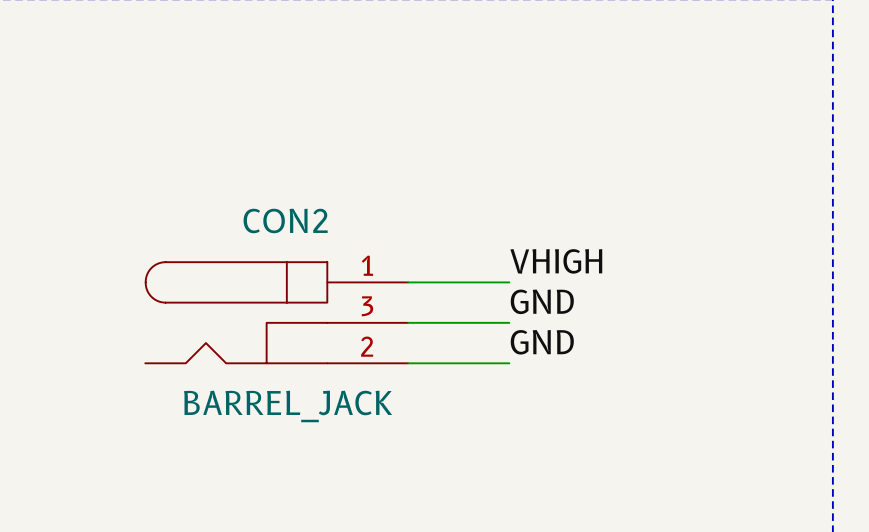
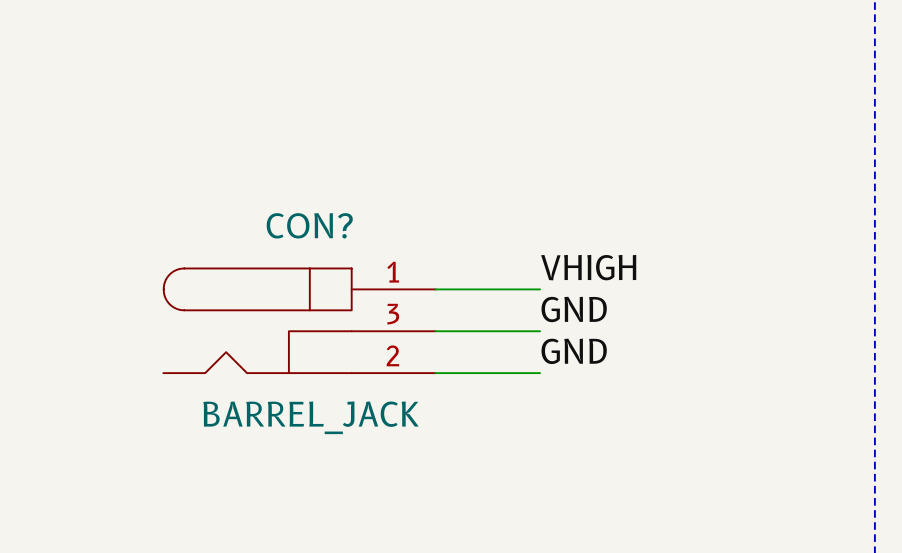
CON2 name: CON2 (285, 220) -> CON? (309, 225)

